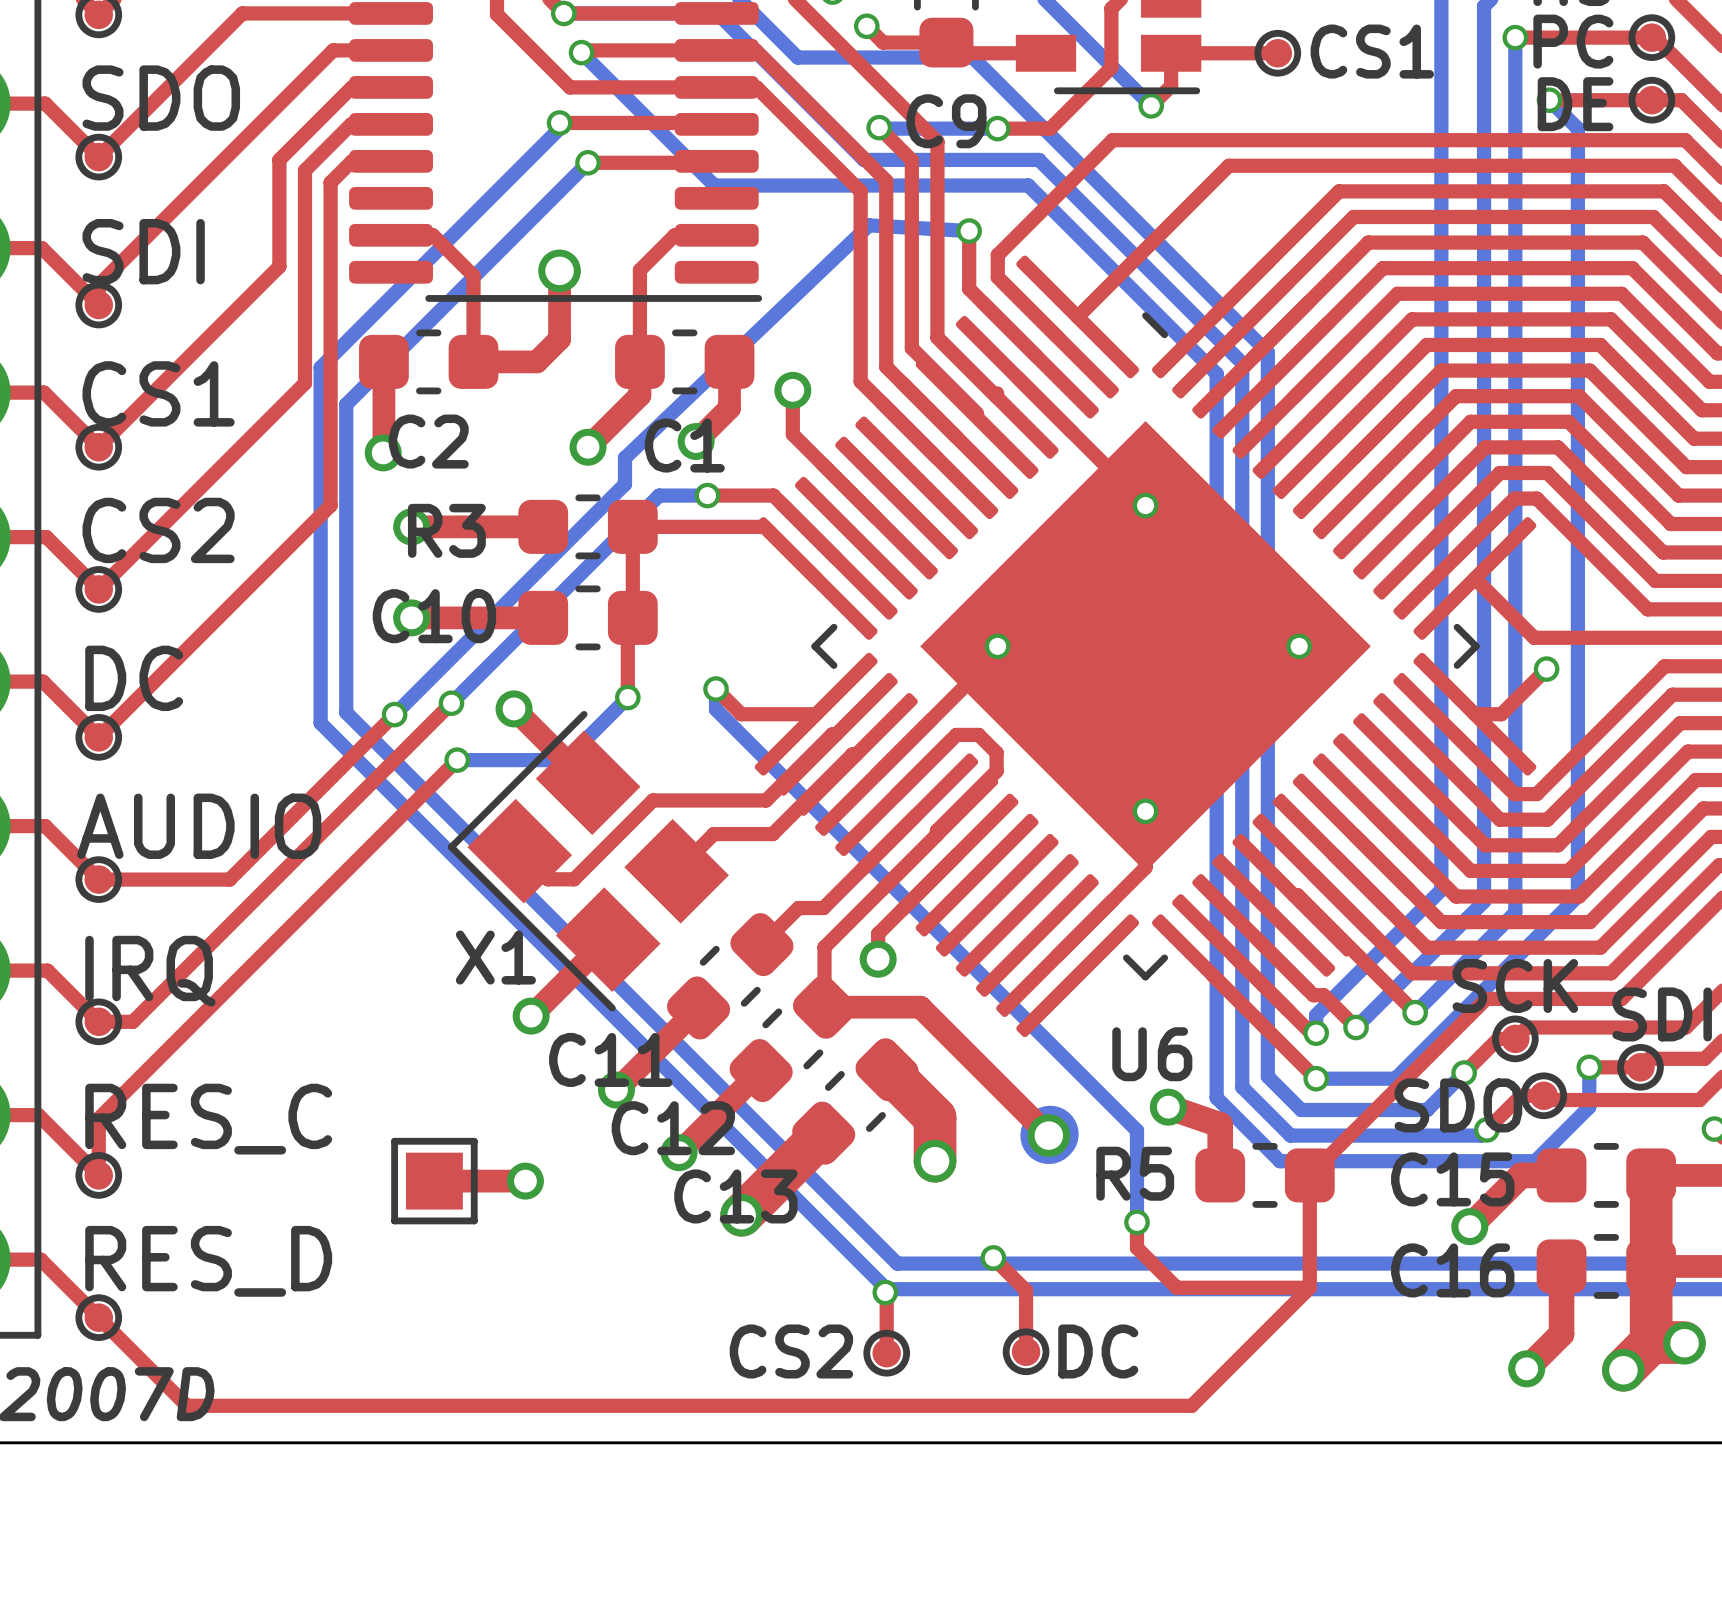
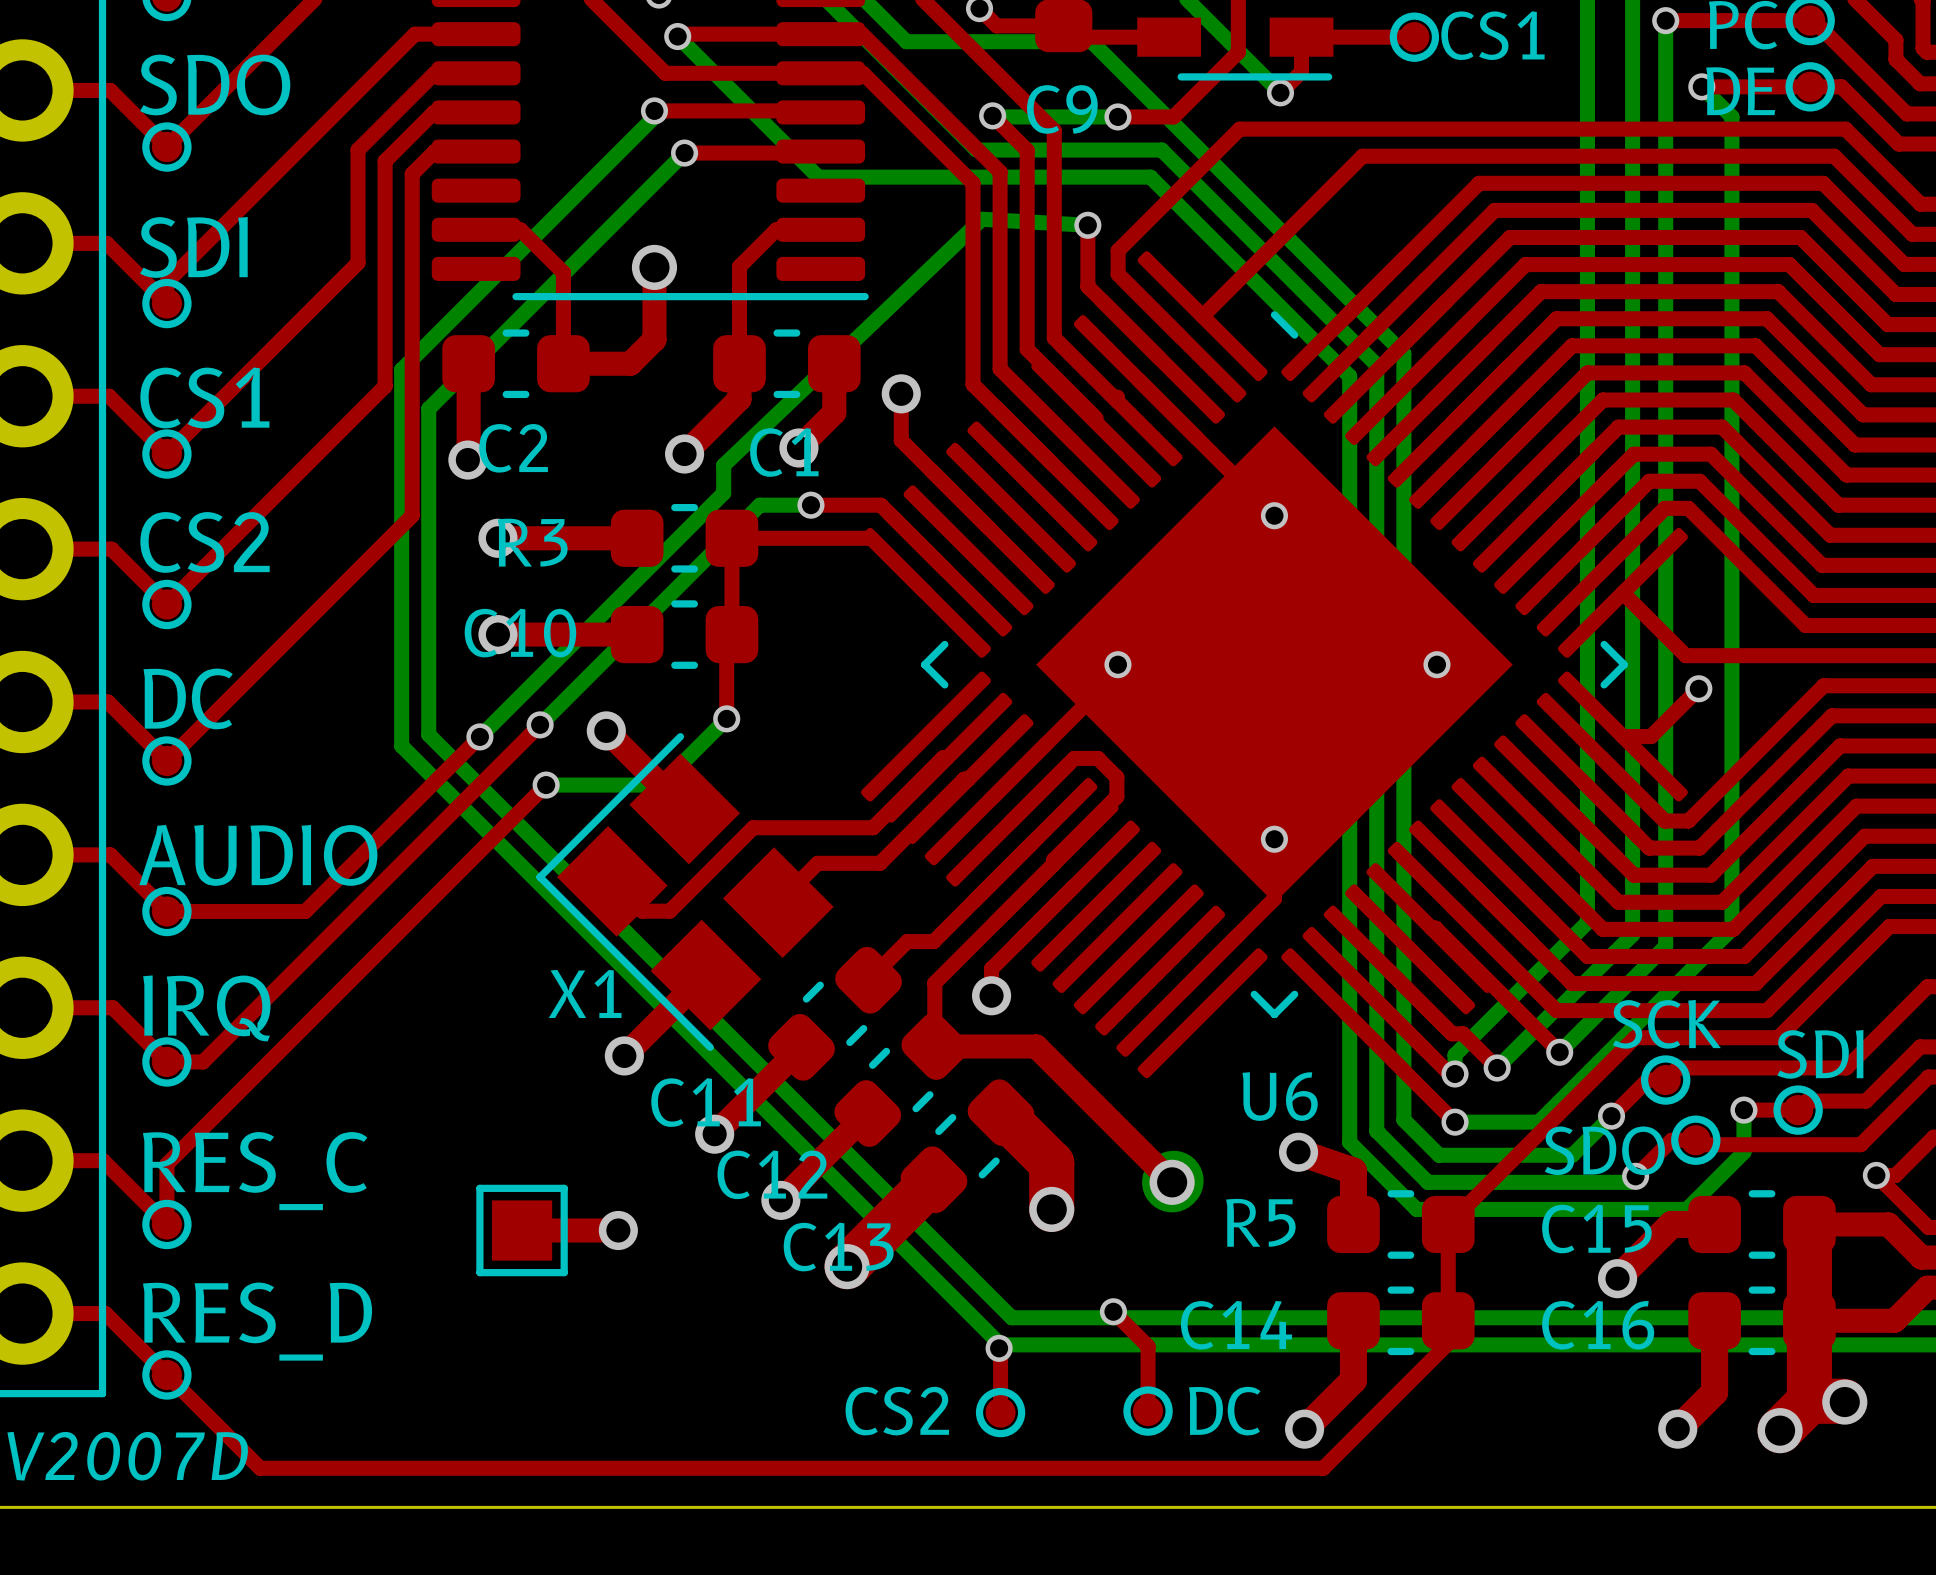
top track: (716, 689) (741, 714) (816, 714) -> none
bottom track: (716, 689) (716, 709) (1137, 1130) (1137, 1222) -> none
via: (716, 689) -> none
top track: (1137, 1222) (1137, 1247) (1176, 1287) (1309, 1287) -> none
via: (1137, 1222) -> none
top track: none -> (1353, 1320) (1353, 1380) (1304, 1429)
C14: none -> (1400, 1320)
via: none -> (1304, 1429)

